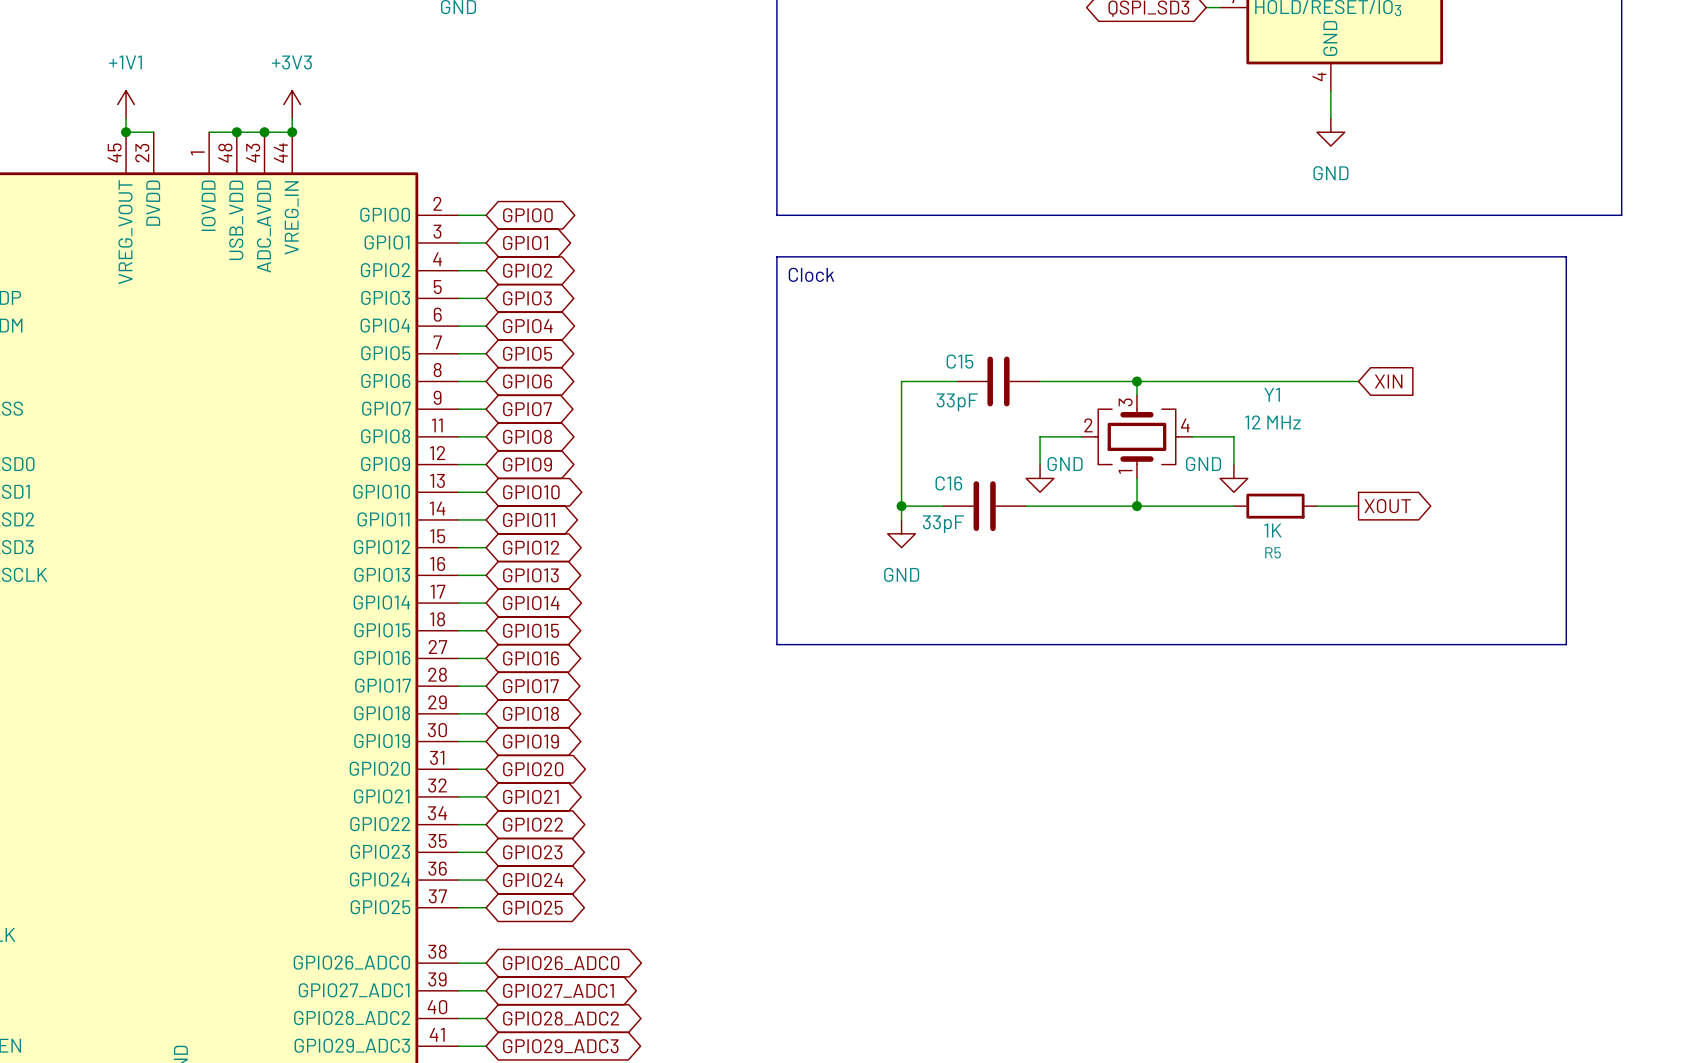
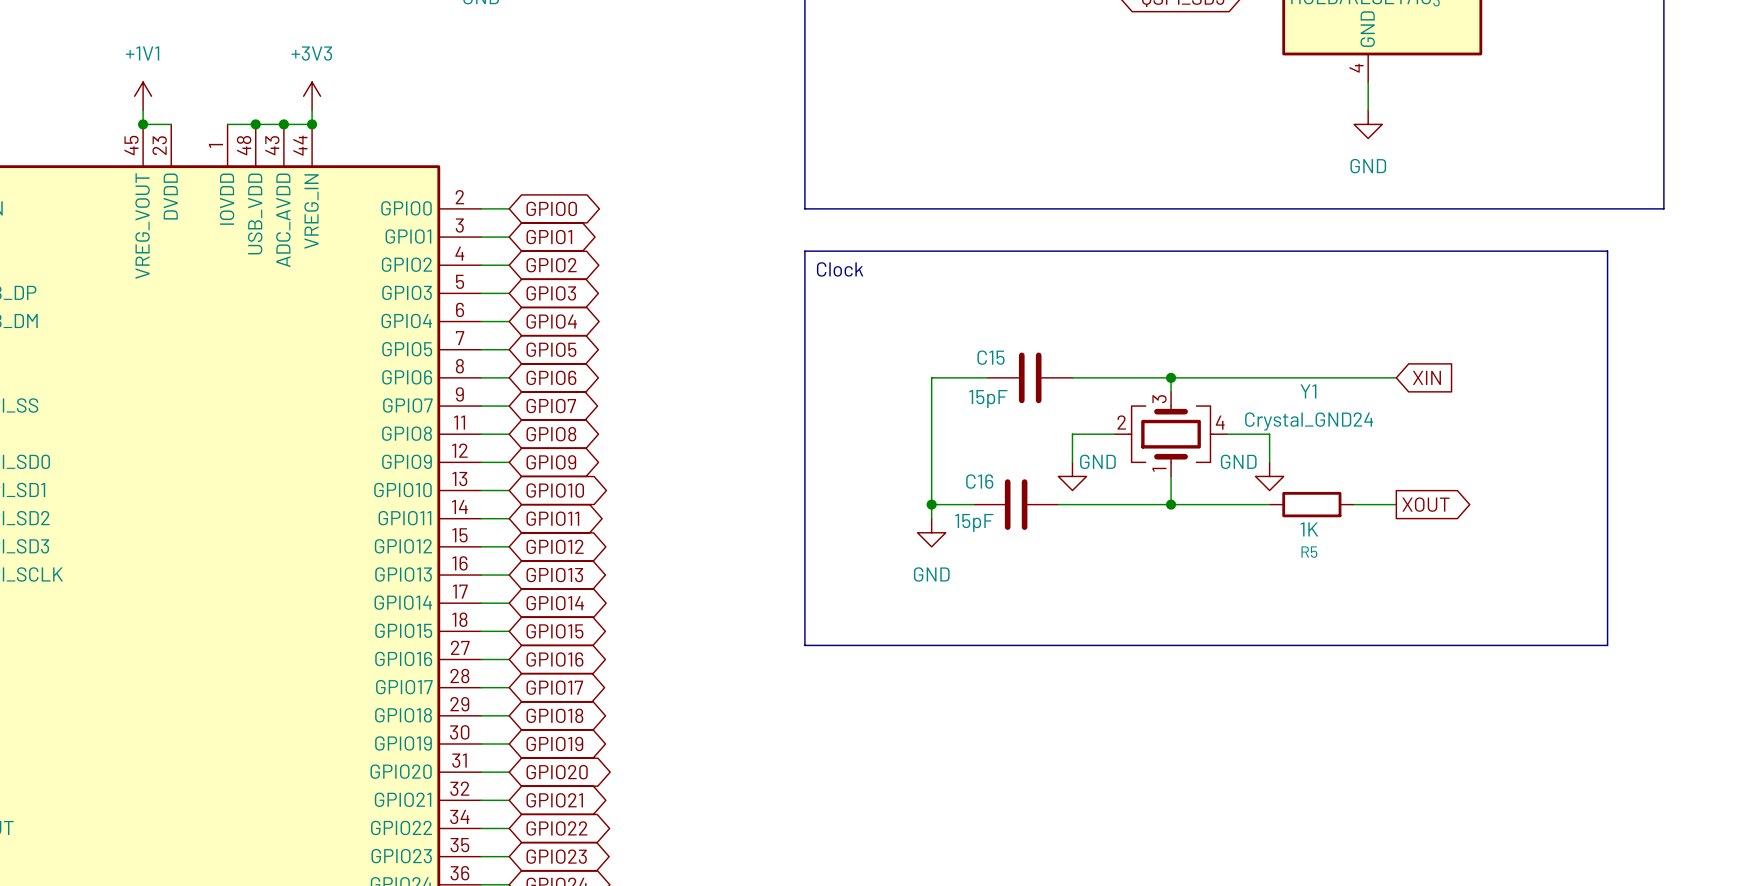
C15 value: 33pF (957, 402) -> 15pF (988, 399)
Y1 value: 12 MHz (1272, 422) -> Crystal_GND24 (1309, 421)
C16 value: 33pF (943, 524) -> 15pF (974, 522)

